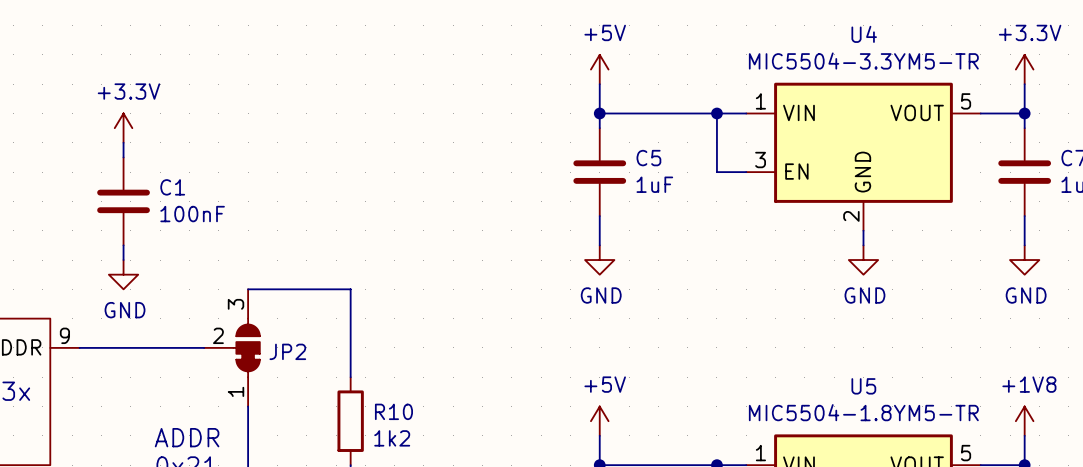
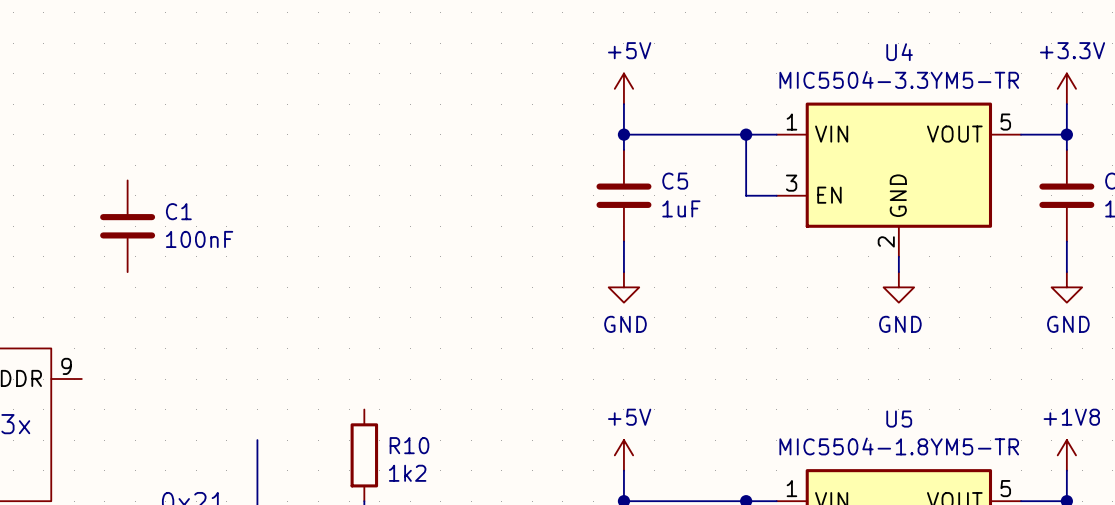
power symbol: +3.3V (123, 128) -> none
wire: (123, 142) (123, 157) -> none
wire: (123, 245) (123, 260) -> none
power symbol: GND (123, 274) -> none
wire: (248, 289) (350, 289) (350, 377) -> none
wire: (79, 347) (204, 347) -> none
JP2: (231, 347) -> none
text: ADDR (187, 437) -> none

